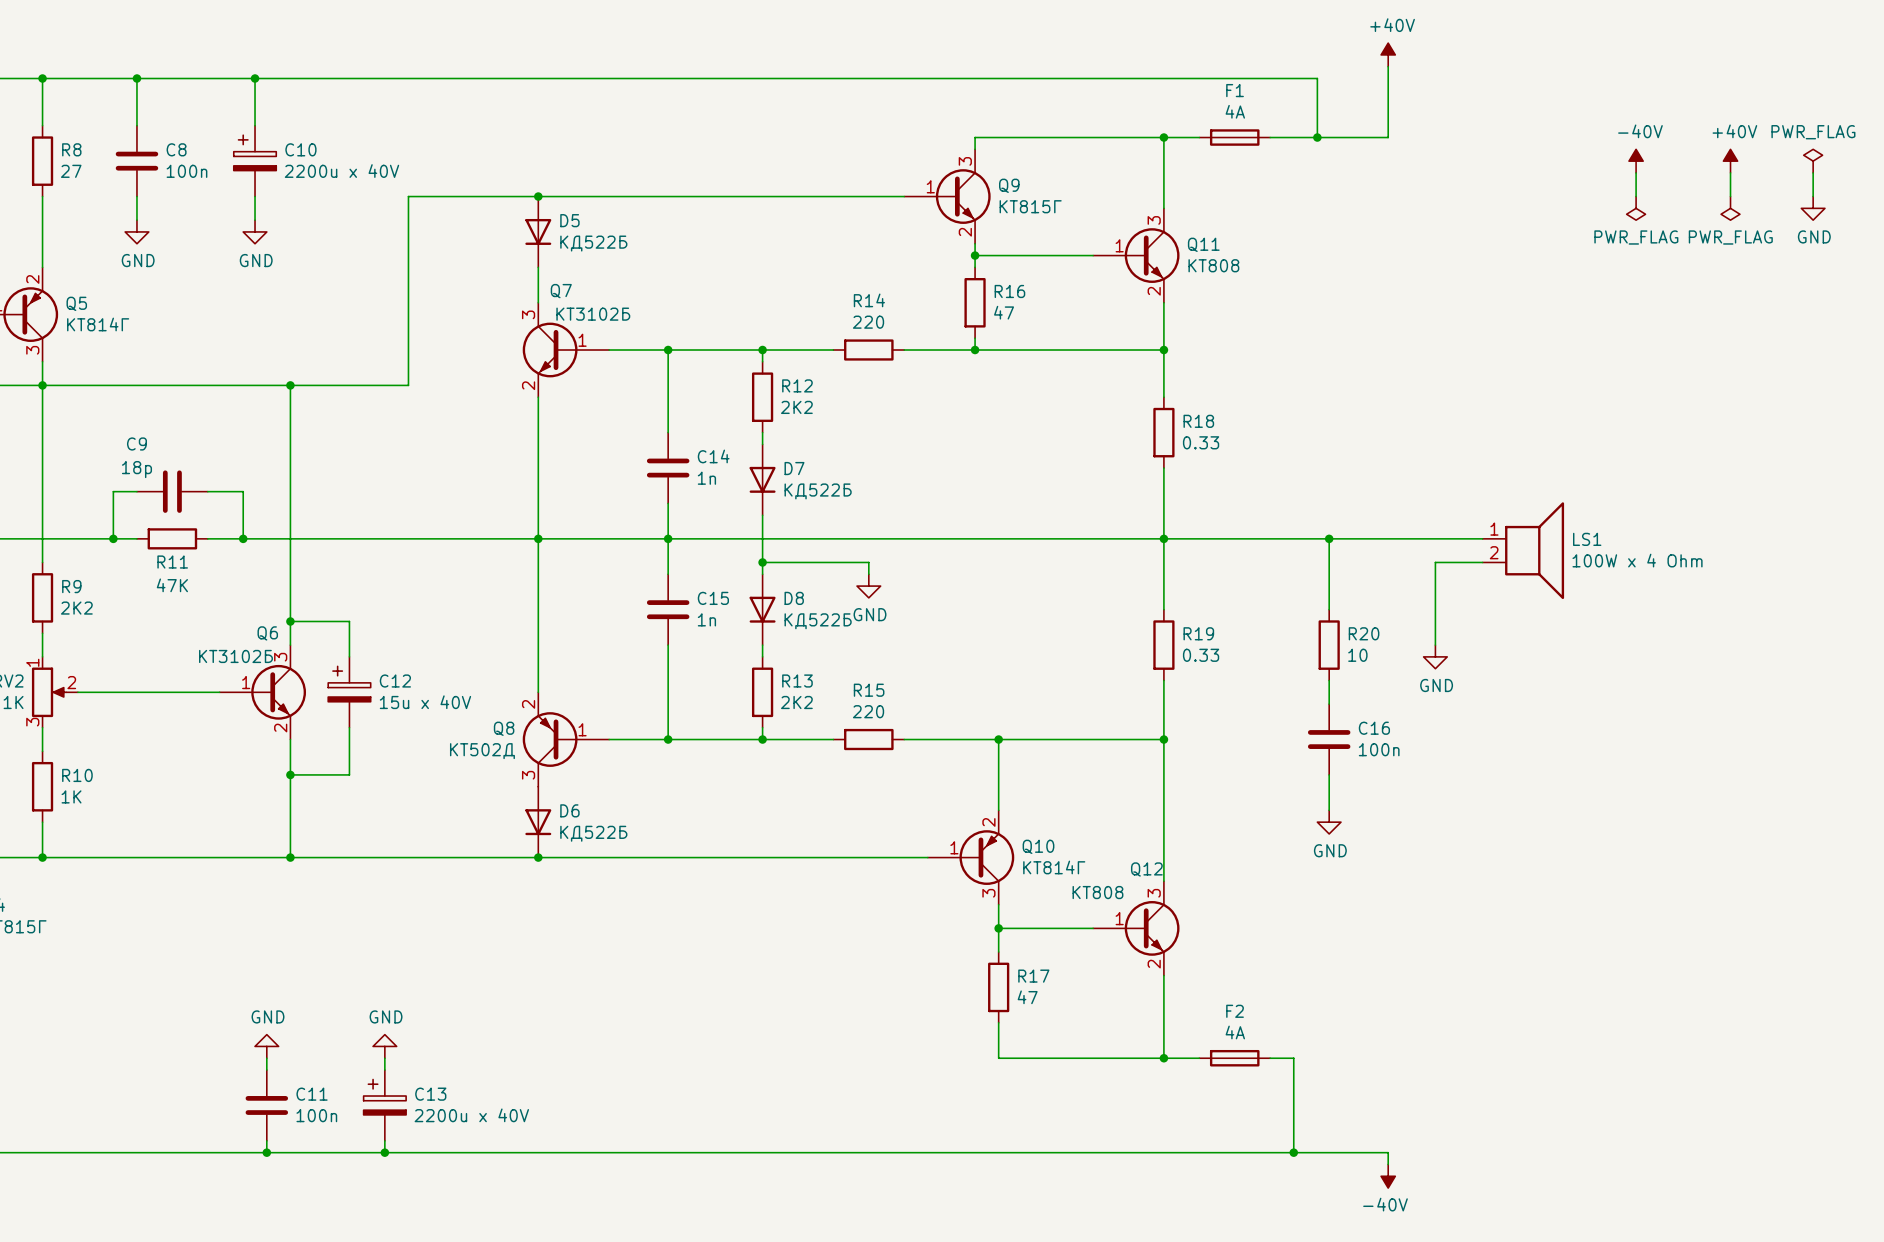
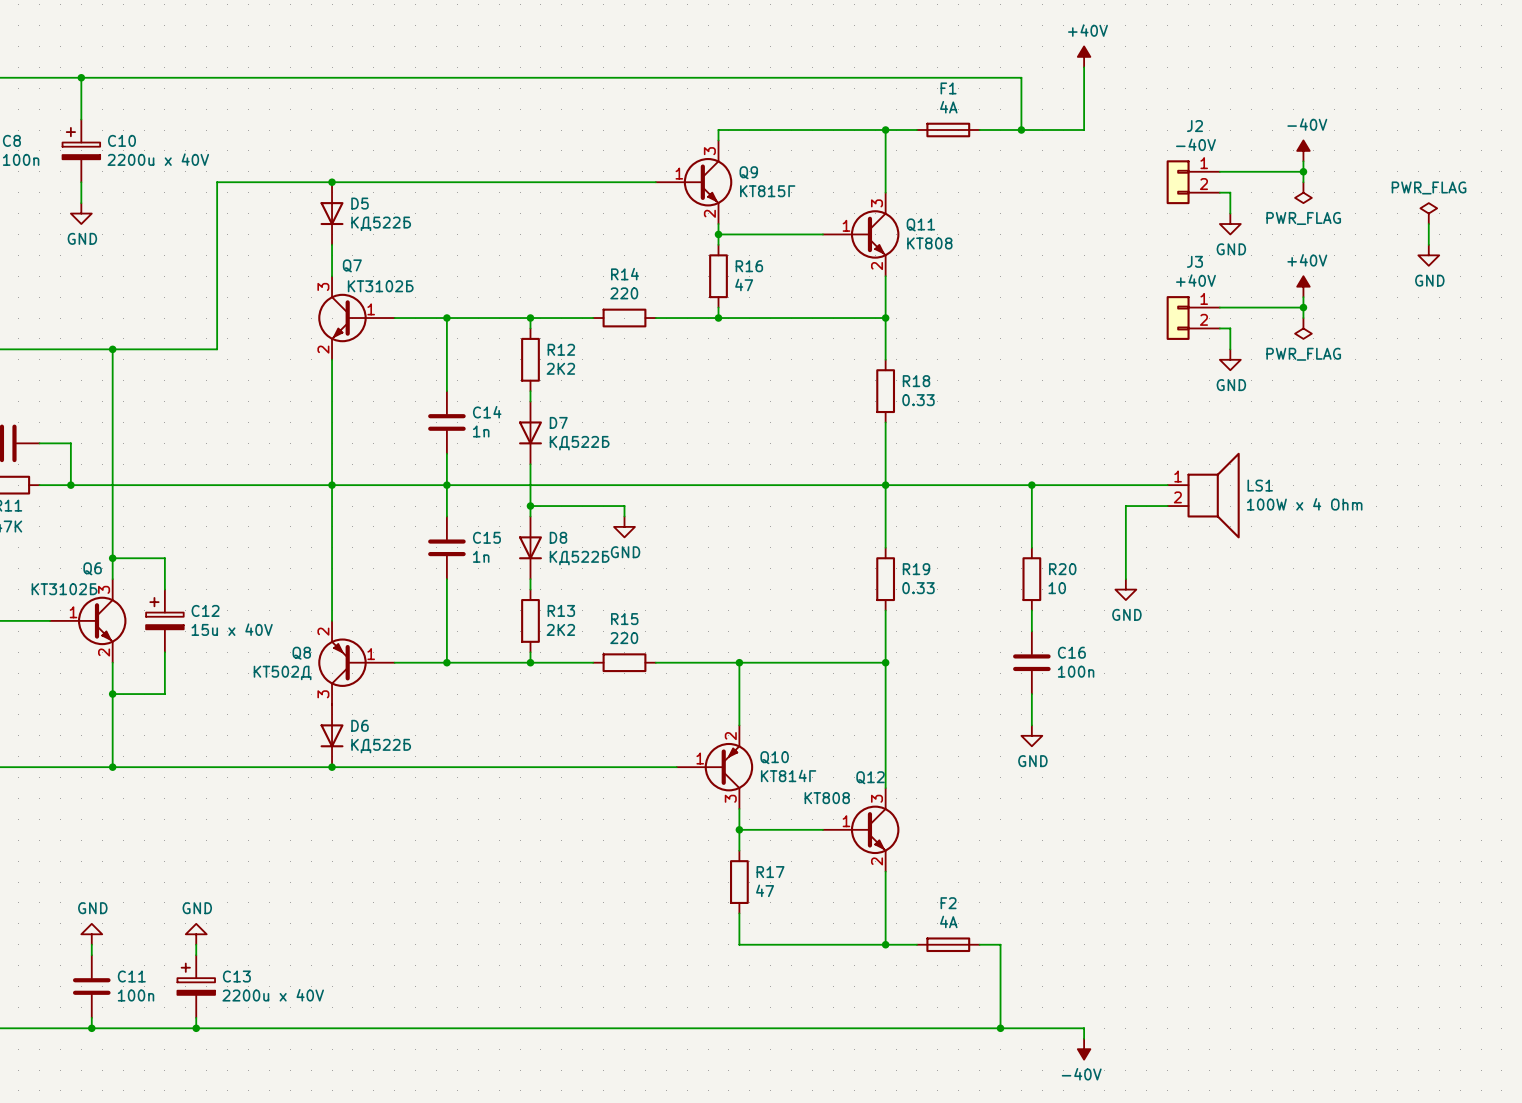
power symbol position: +40V (1730, 161) -> +40V (1303, 286)
power symbol: PWR_FLAG (1813, 161) -> none
wire: (1730, 172) (1730, 196) -> (1303, 297) (1303, 318)
wire: (1813, 172) (1813, 196) -> (1428, 224) (1428, 244)
wire: none -> (1219, 171) (1303, 171)
junction: none -> (1303, 171)
J2: none -> -40V (1193, 182)
wire: none -> (1219, 192) (1230, 192) (1230, 213)
power symbol: PWR_FLAG (1730, 208) -> none
power symbol position: GND (1813, 208) -> GND (1428, 255)
power symbol: none -> PWR_FLAG (1428, 213)
power symbol: none -> GND (1230, 224)
wire: none -> (1219, 307) (1303, 307)
junction: none -> (1303, 307)
J3: none -> +40V (1193, 318)
wire: none -> (1219, 328) (1230, 328) (1230, 349)
power symbol: none -> PWR_FLAG (1303, 328)
power symbol: none -> GND (1230, 359)

